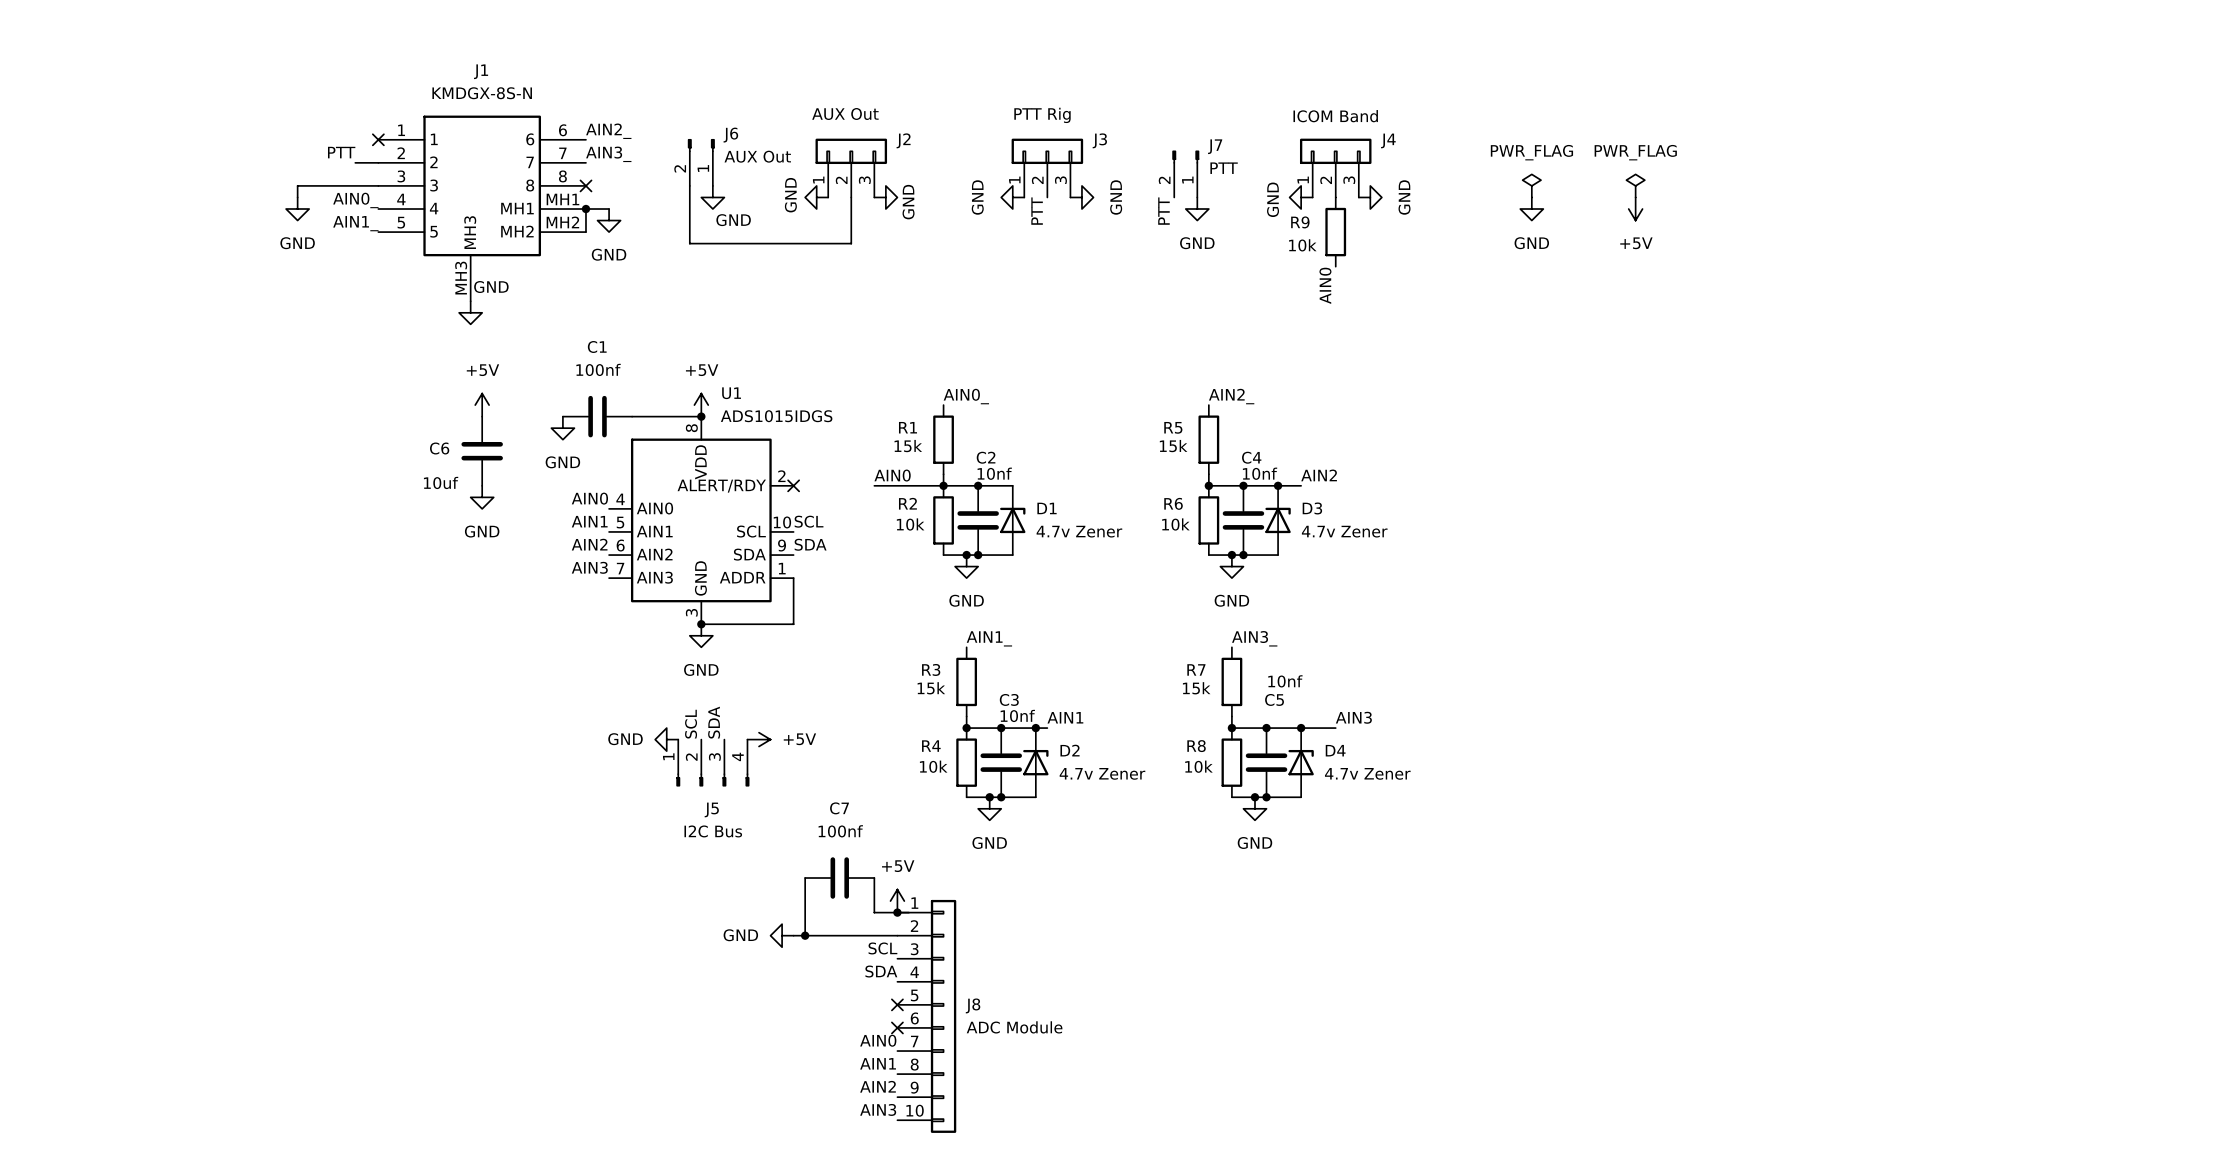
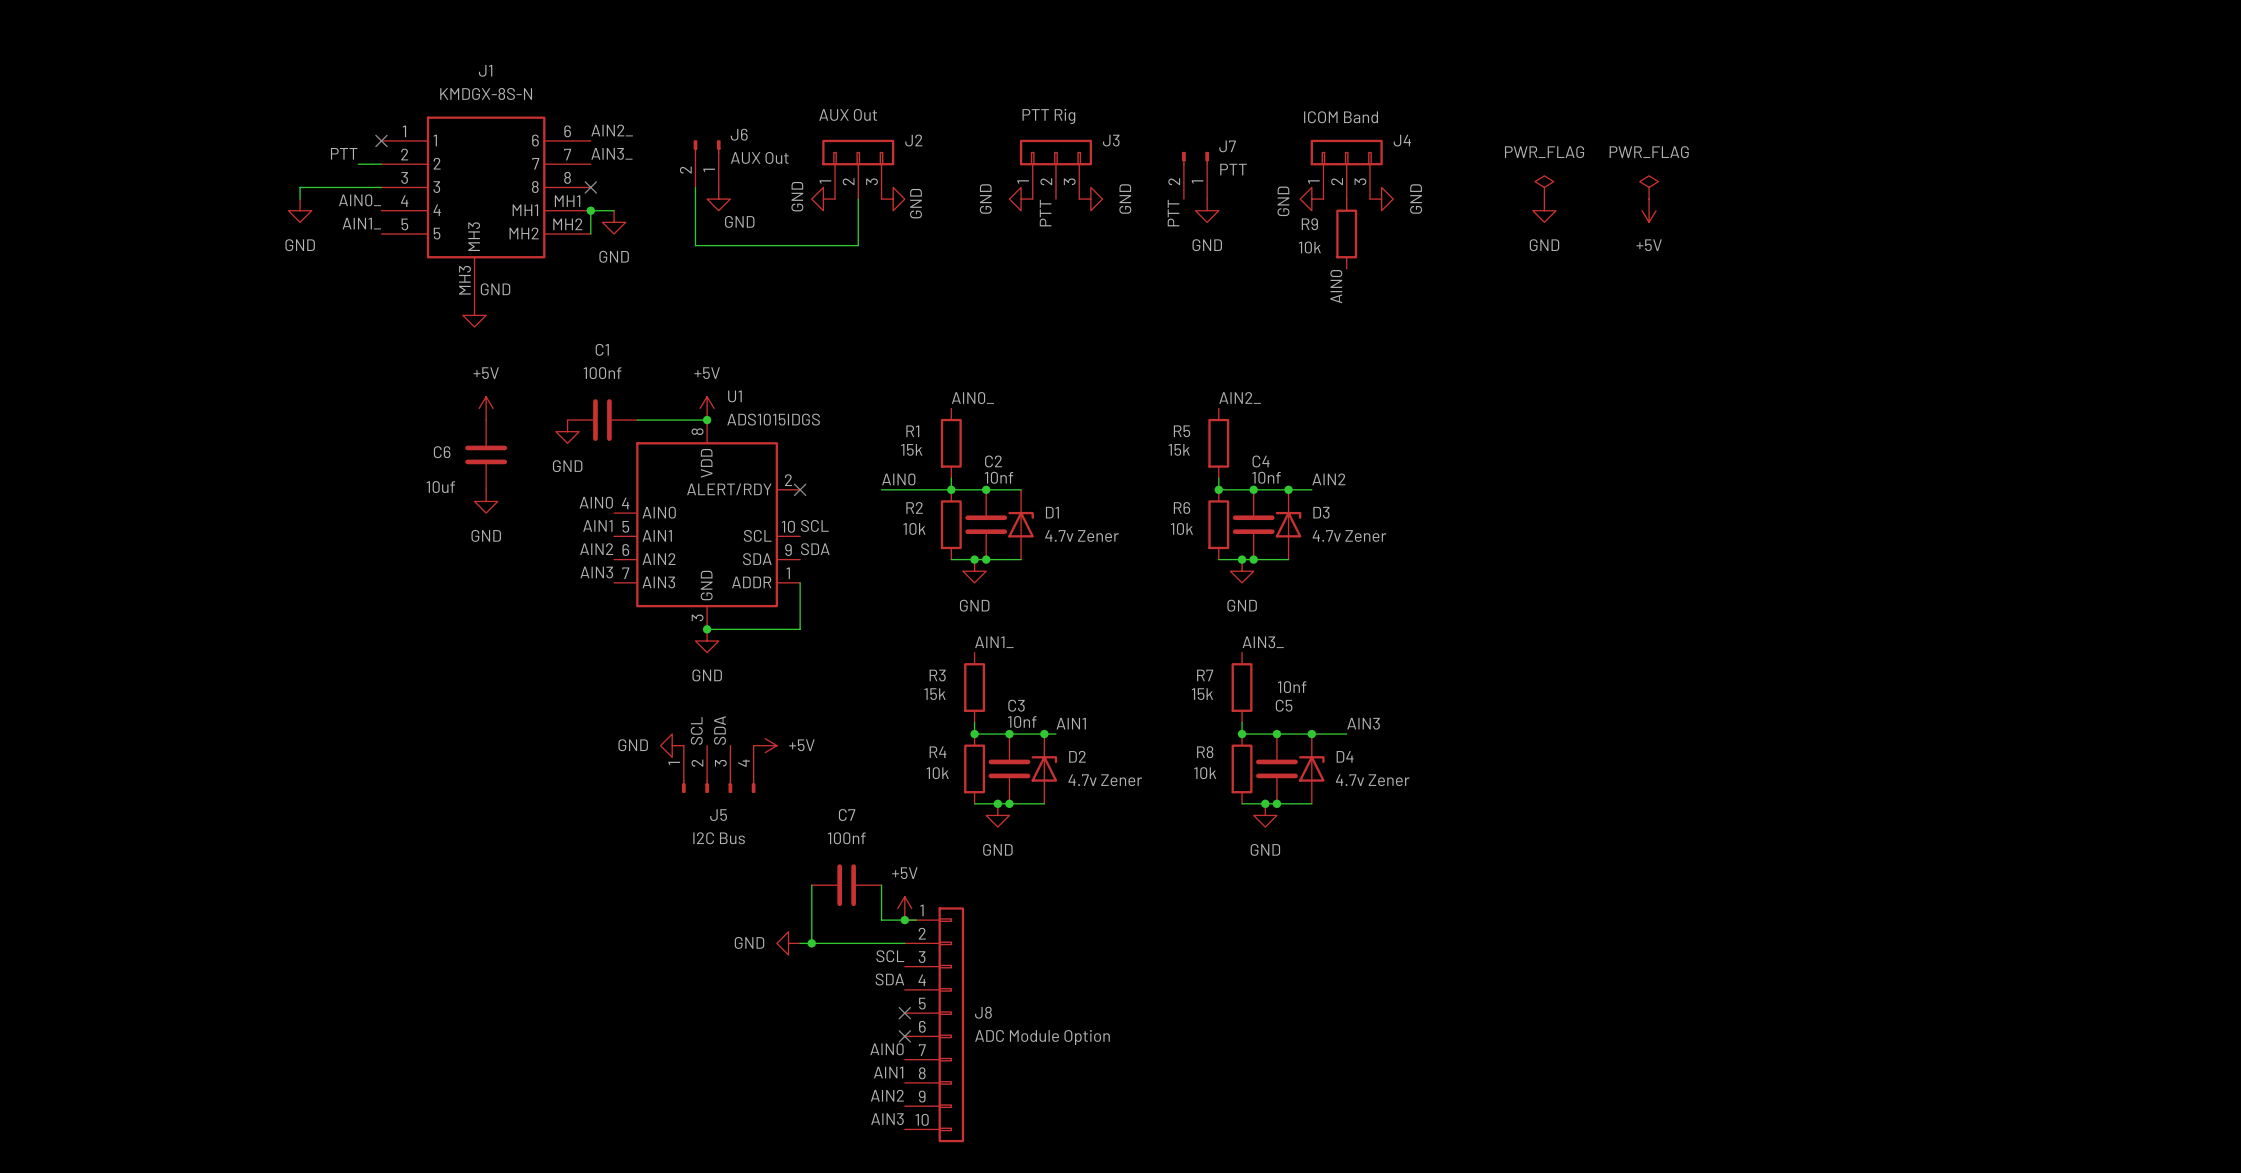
J8 value: ADC Module (1014, 1027) -> ADC Module Option (1042, 1037)

